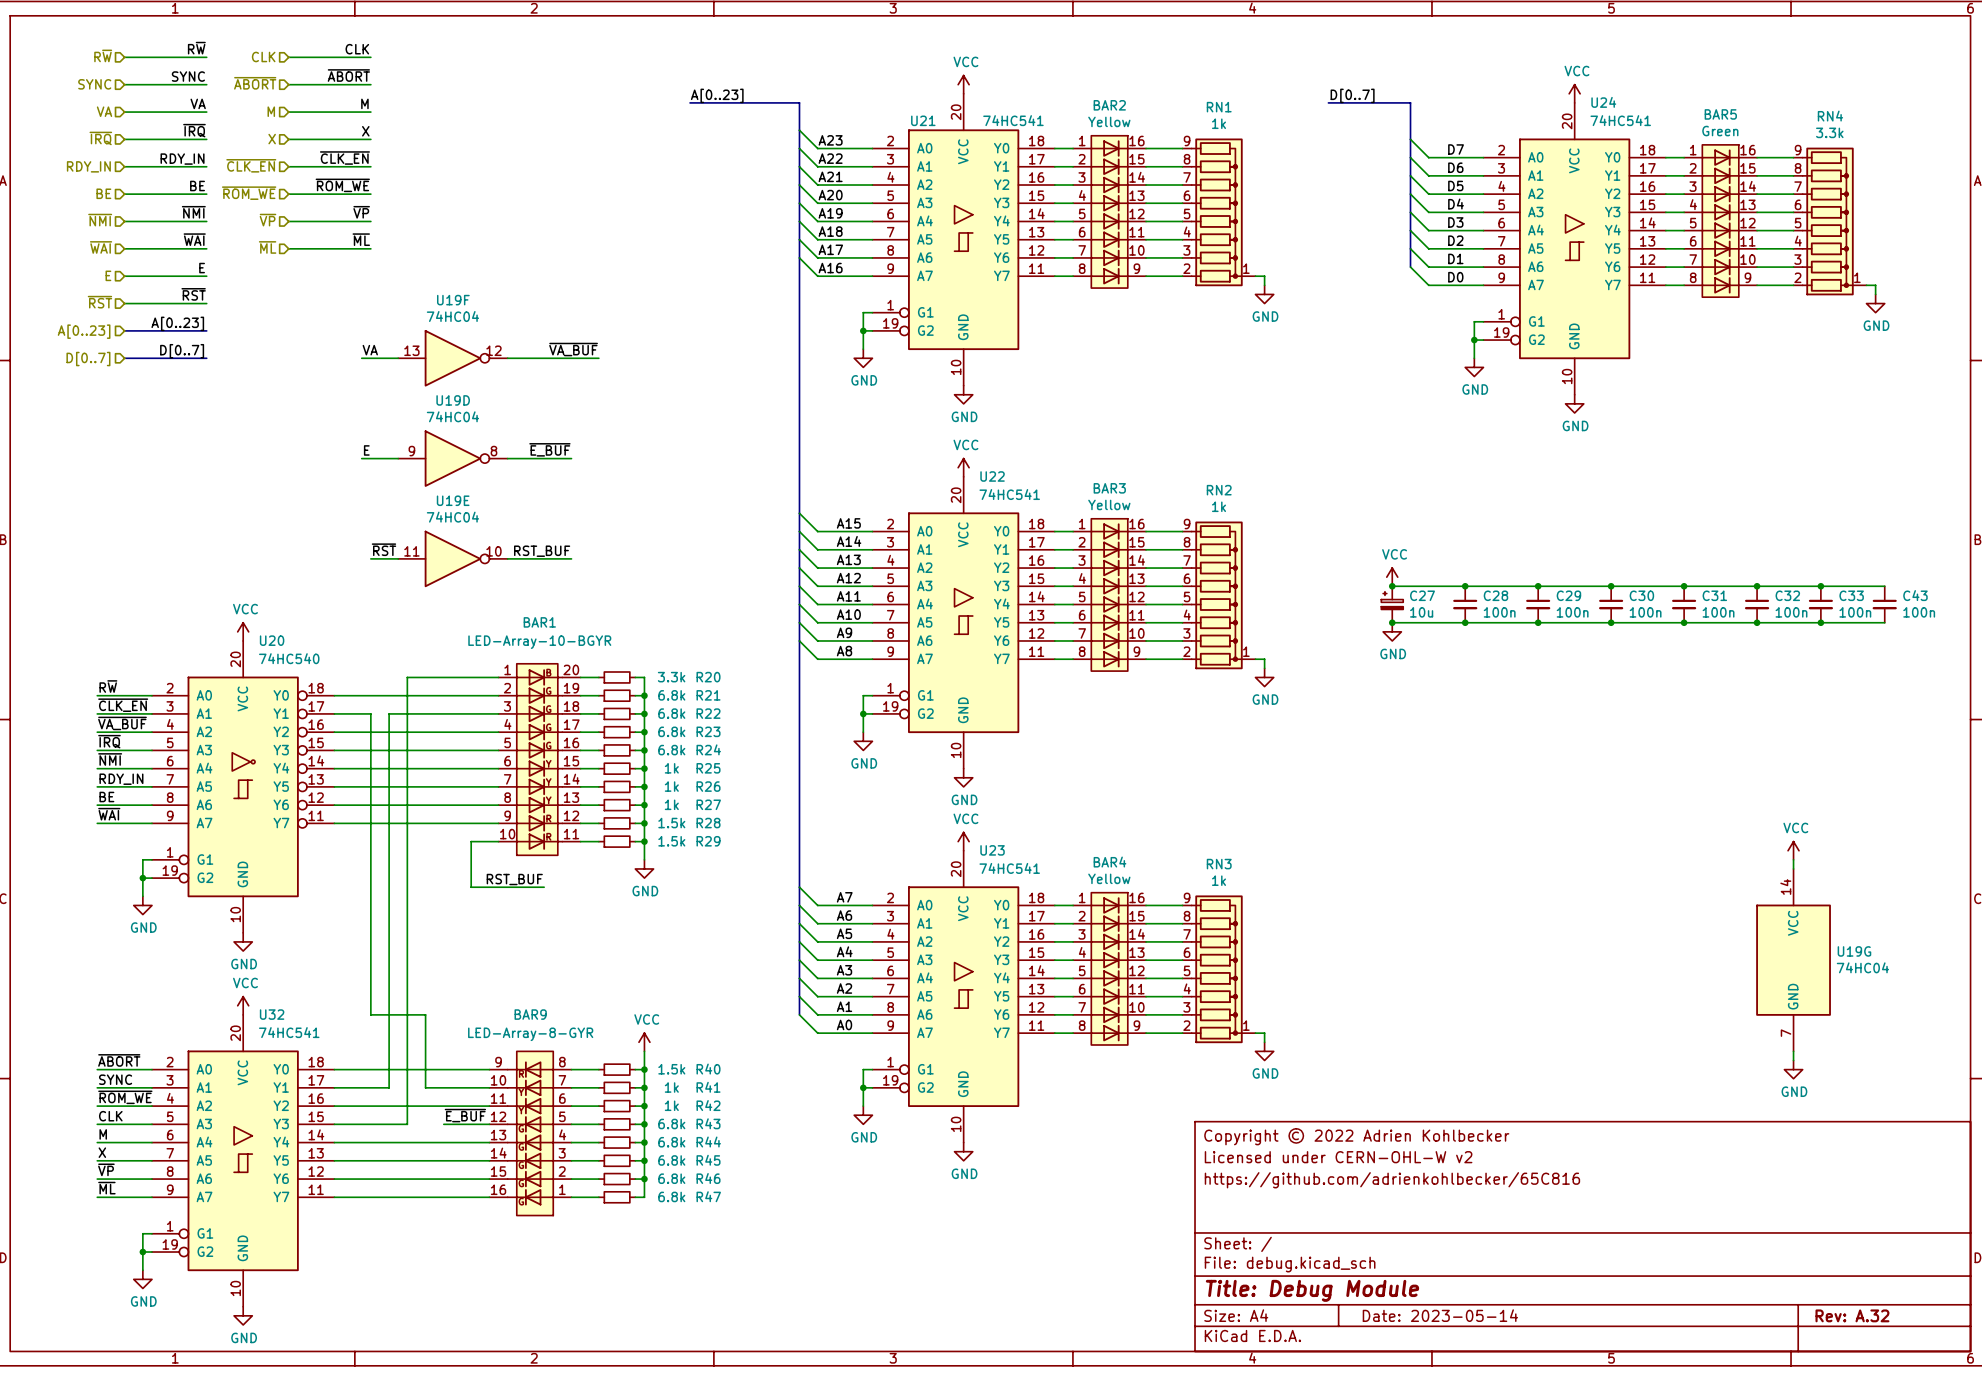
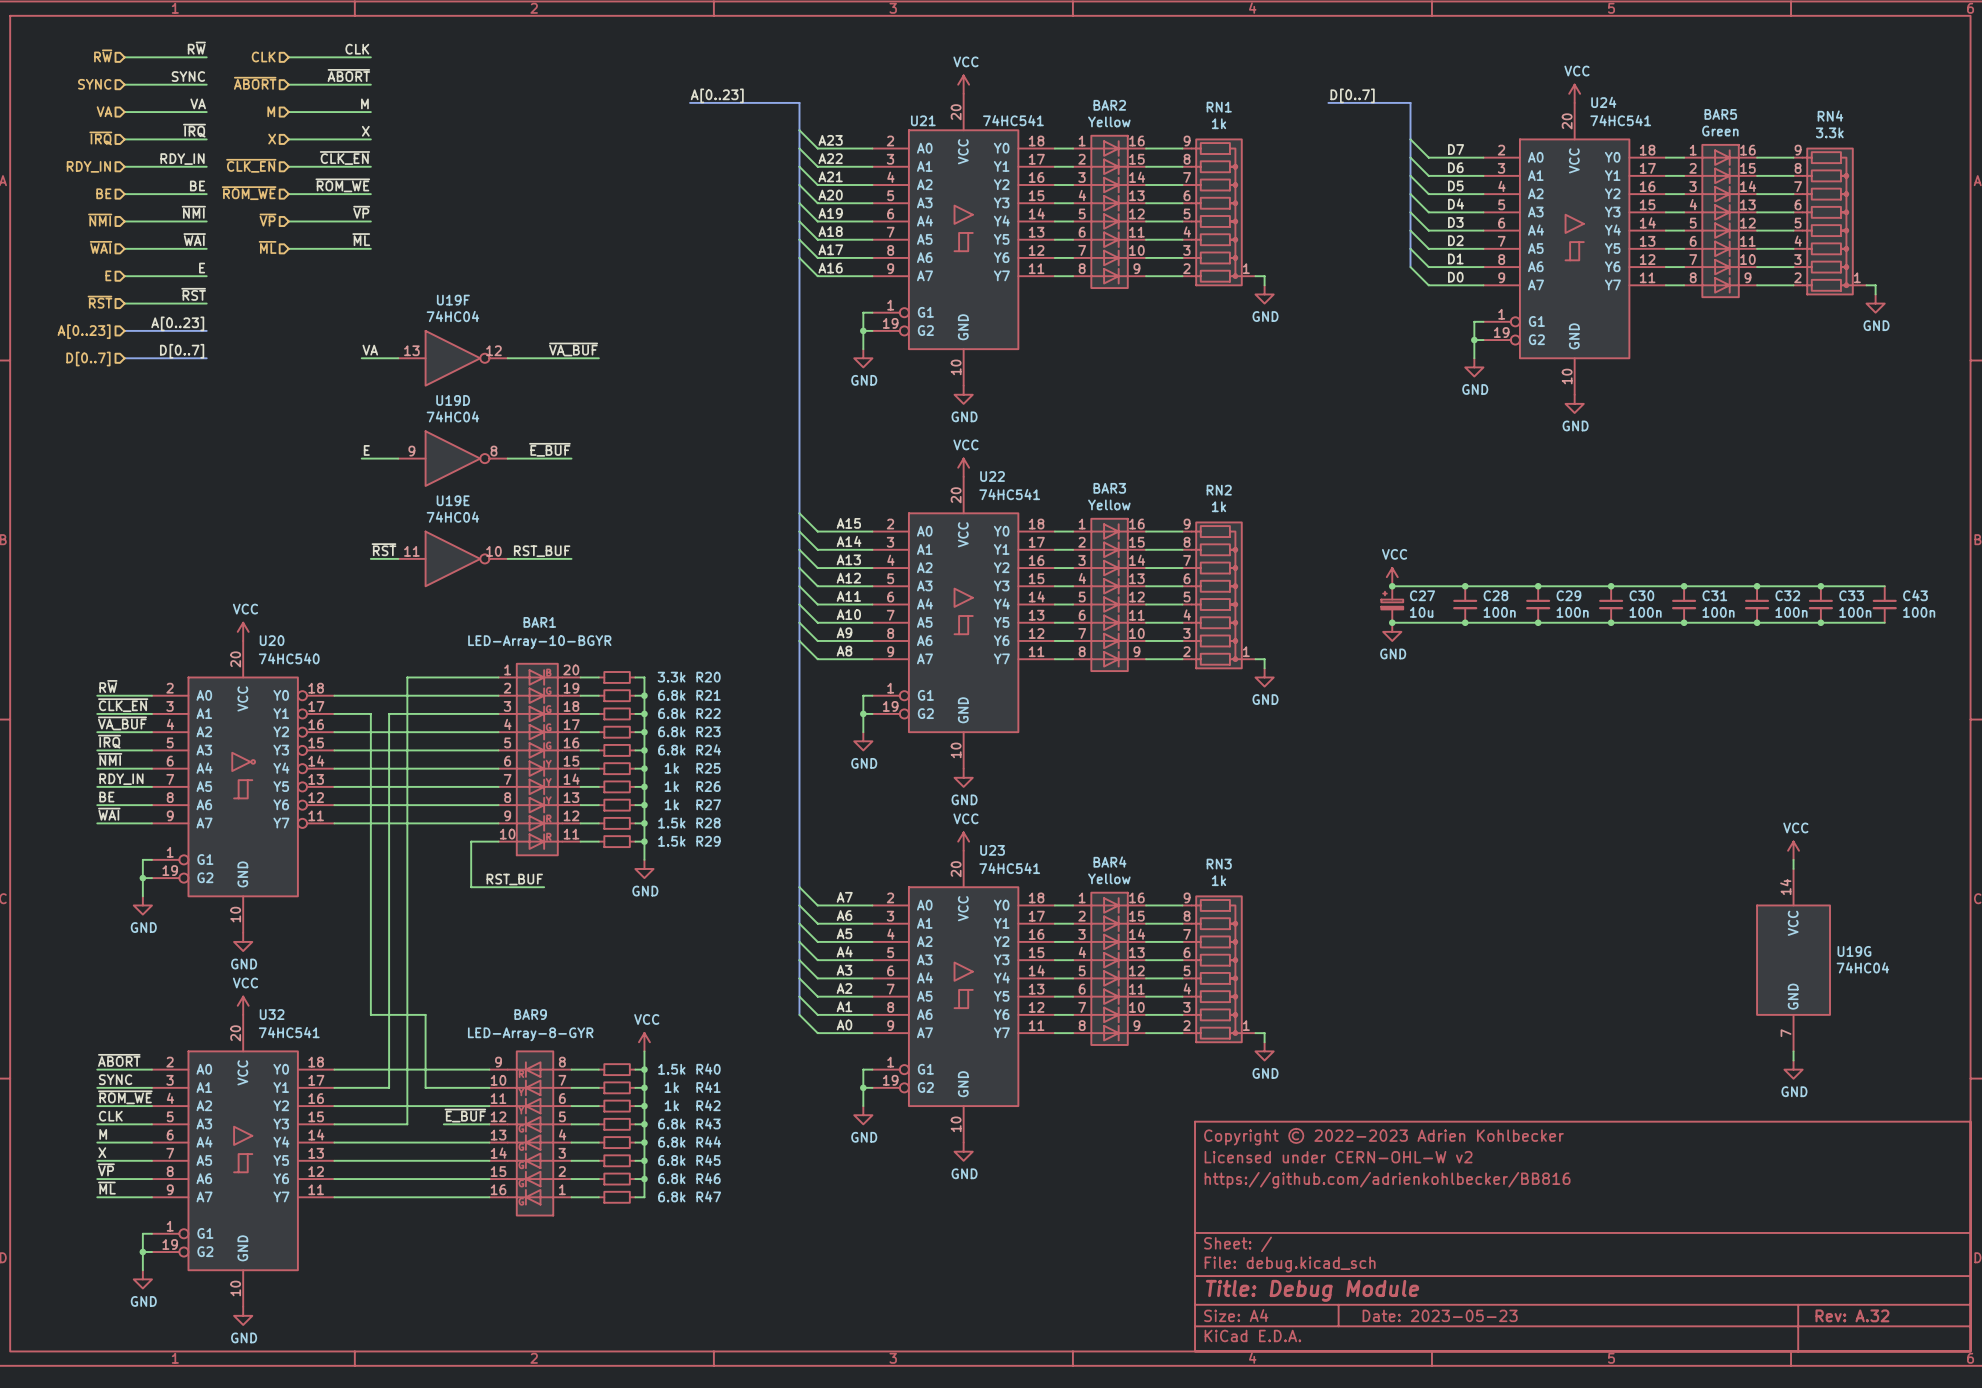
title block: Copyright © 2022 Adrien Kohlbecker (1356, 1136) -> Copyright © 2022-2023 Adrien Kohlbecker (1383, 1136)
title block: https://github.com/adrienkohlbecker/65C816 (1392, 1180) -> https://github.com/adrienkohlbecker/BB816 (1387, 1180)
title block: Date: 2023-05-14 (1440, 1315) -> Date: 2023-05-23 (1440, 1315)

